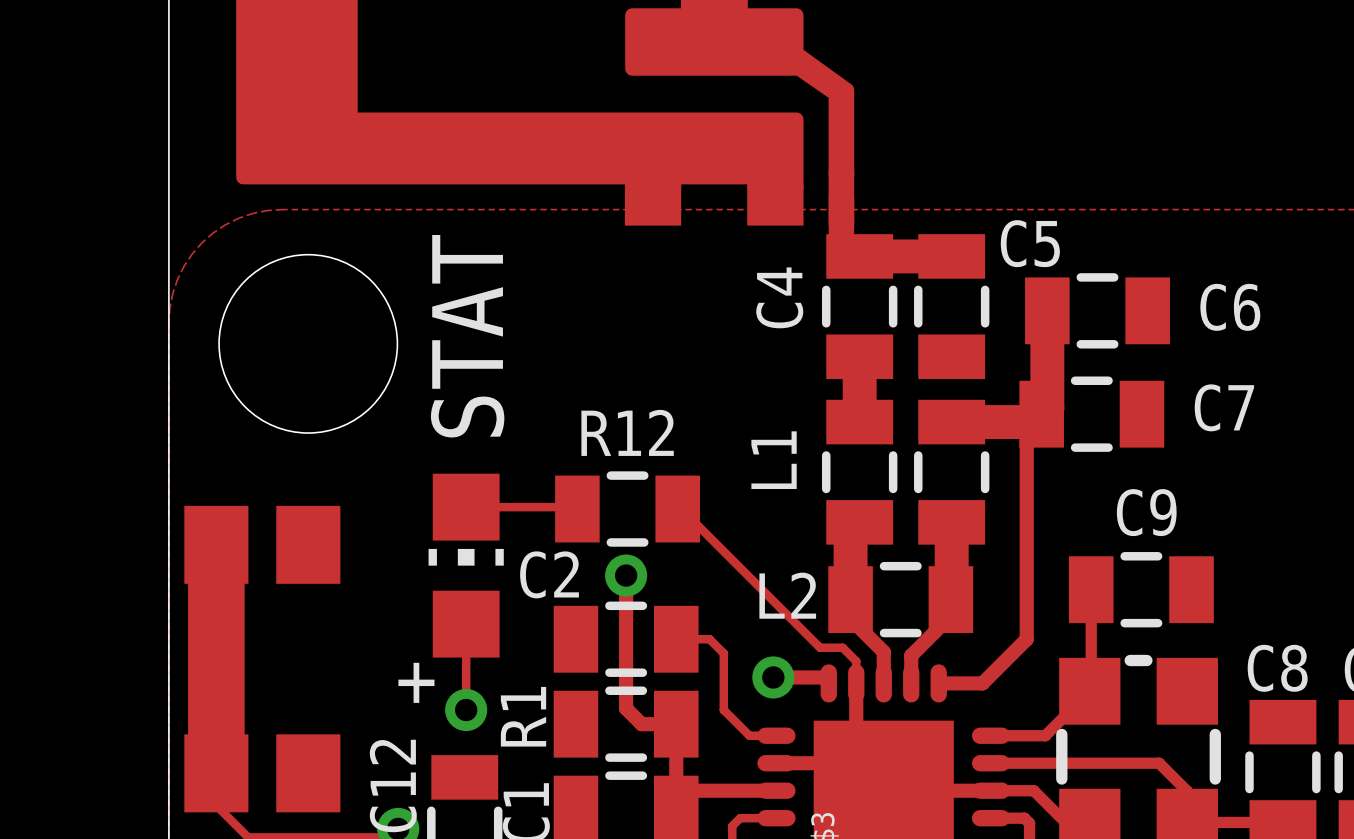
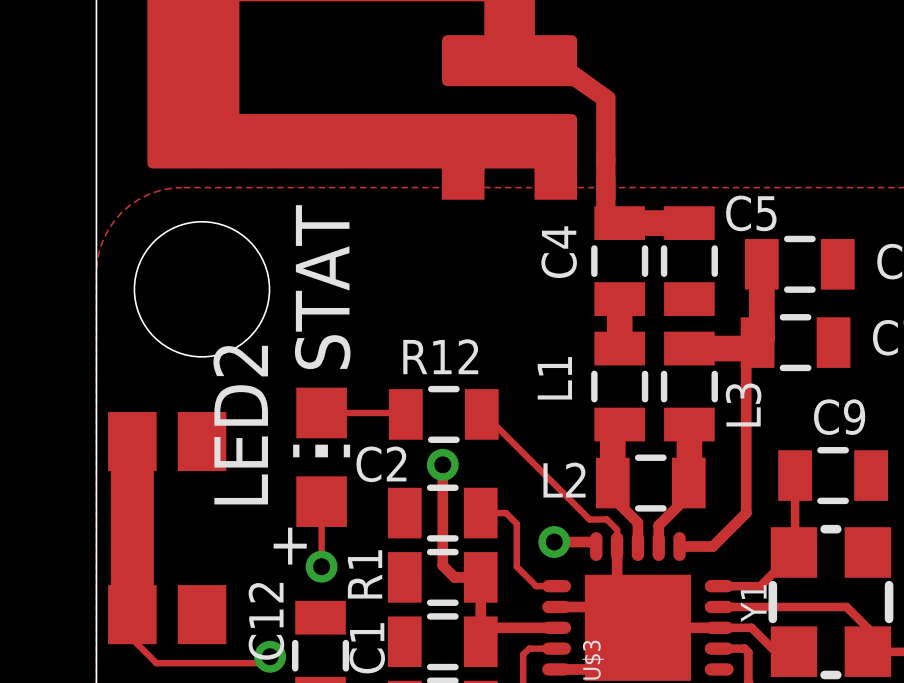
L3 name: none -> L3 (743, 405)
LED2 name: none -> LED2 (240, 425)
Y1 name: none -> Y1 (753, 603)

